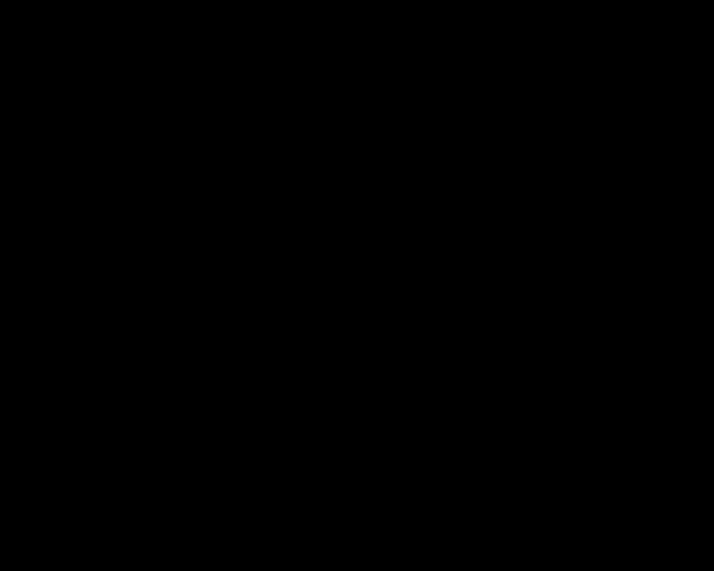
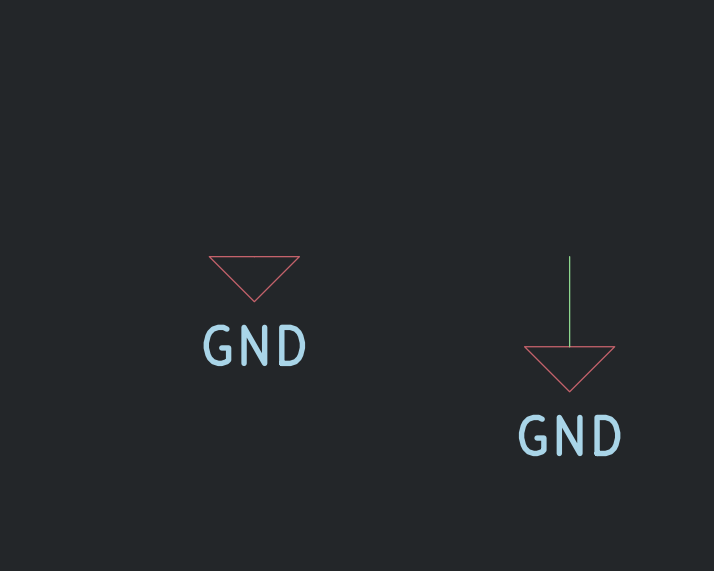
wire: none -> (569, 256) (569, 346)
power symbol: none -> GND (254, 279)
power symbol: none -> GND (569, 369)

